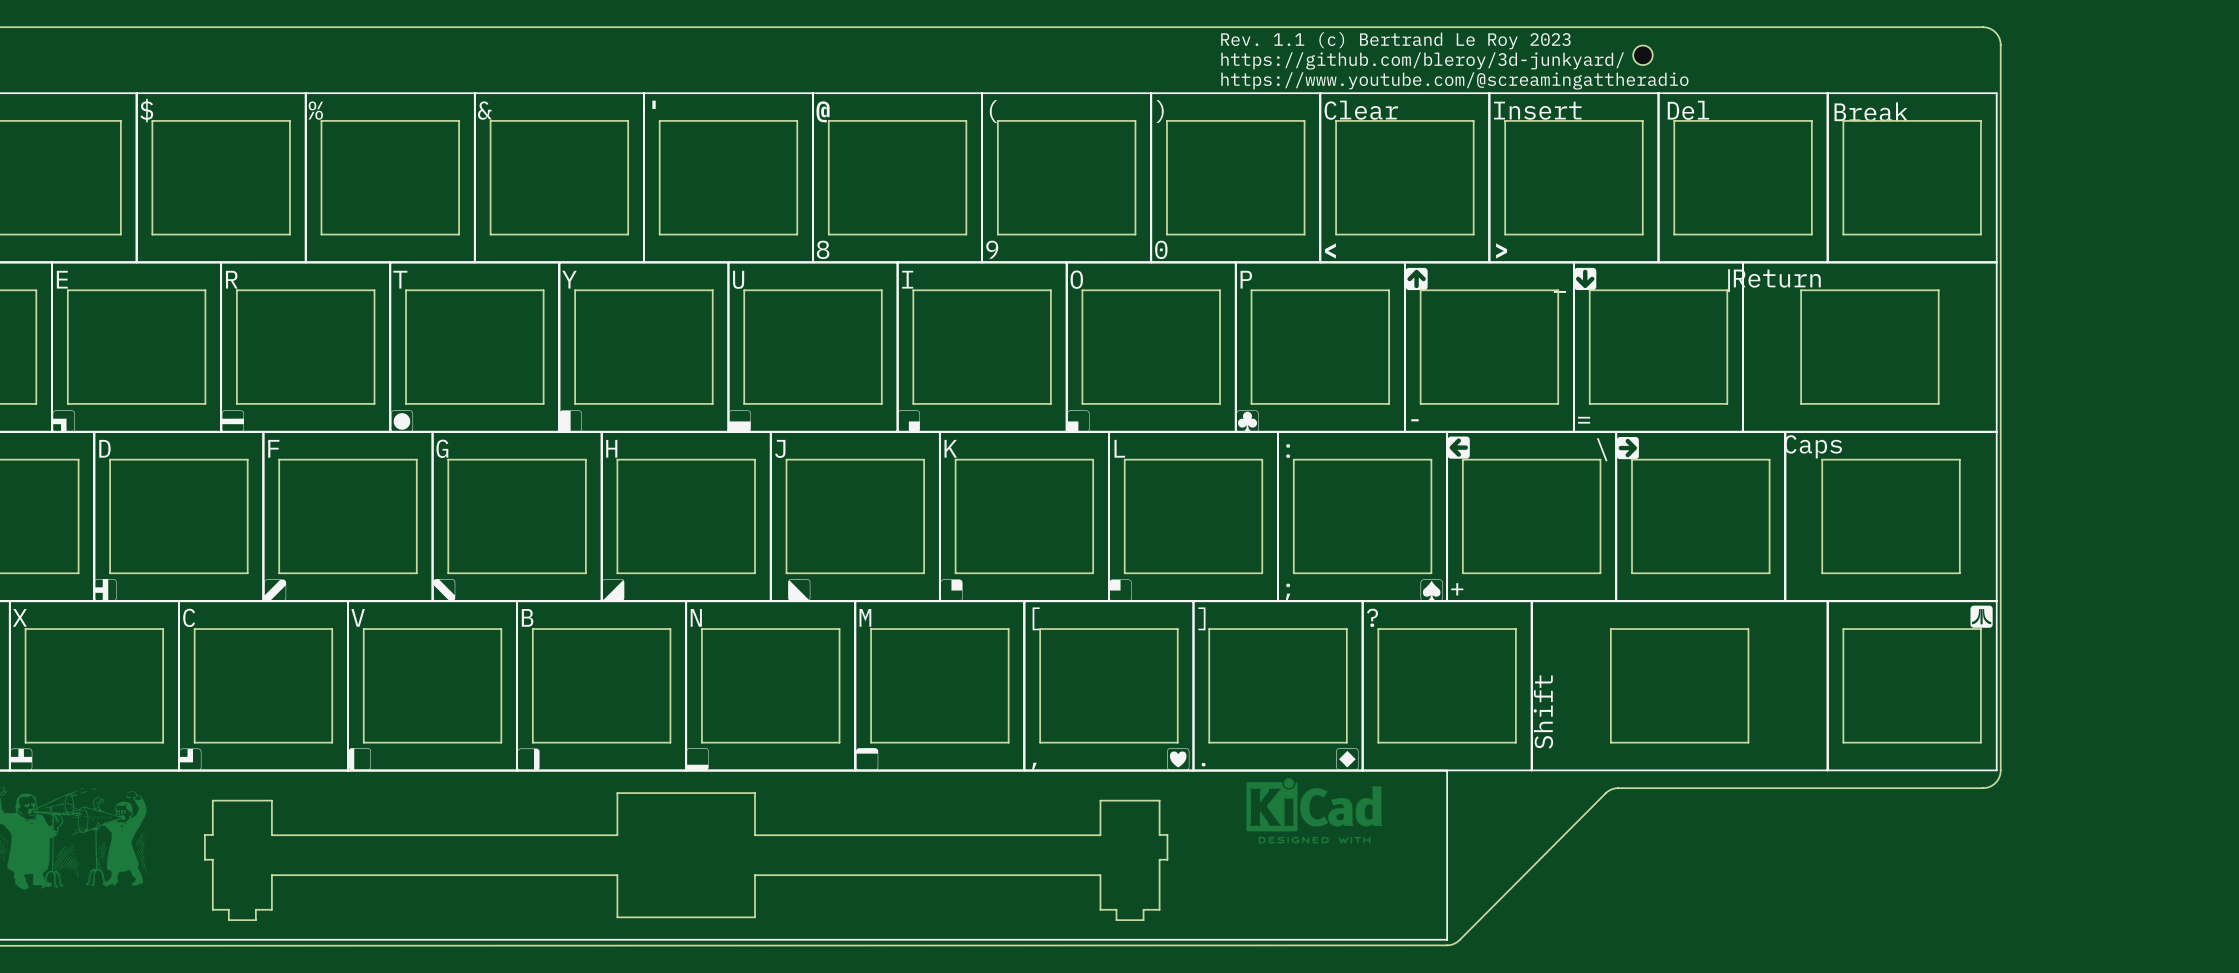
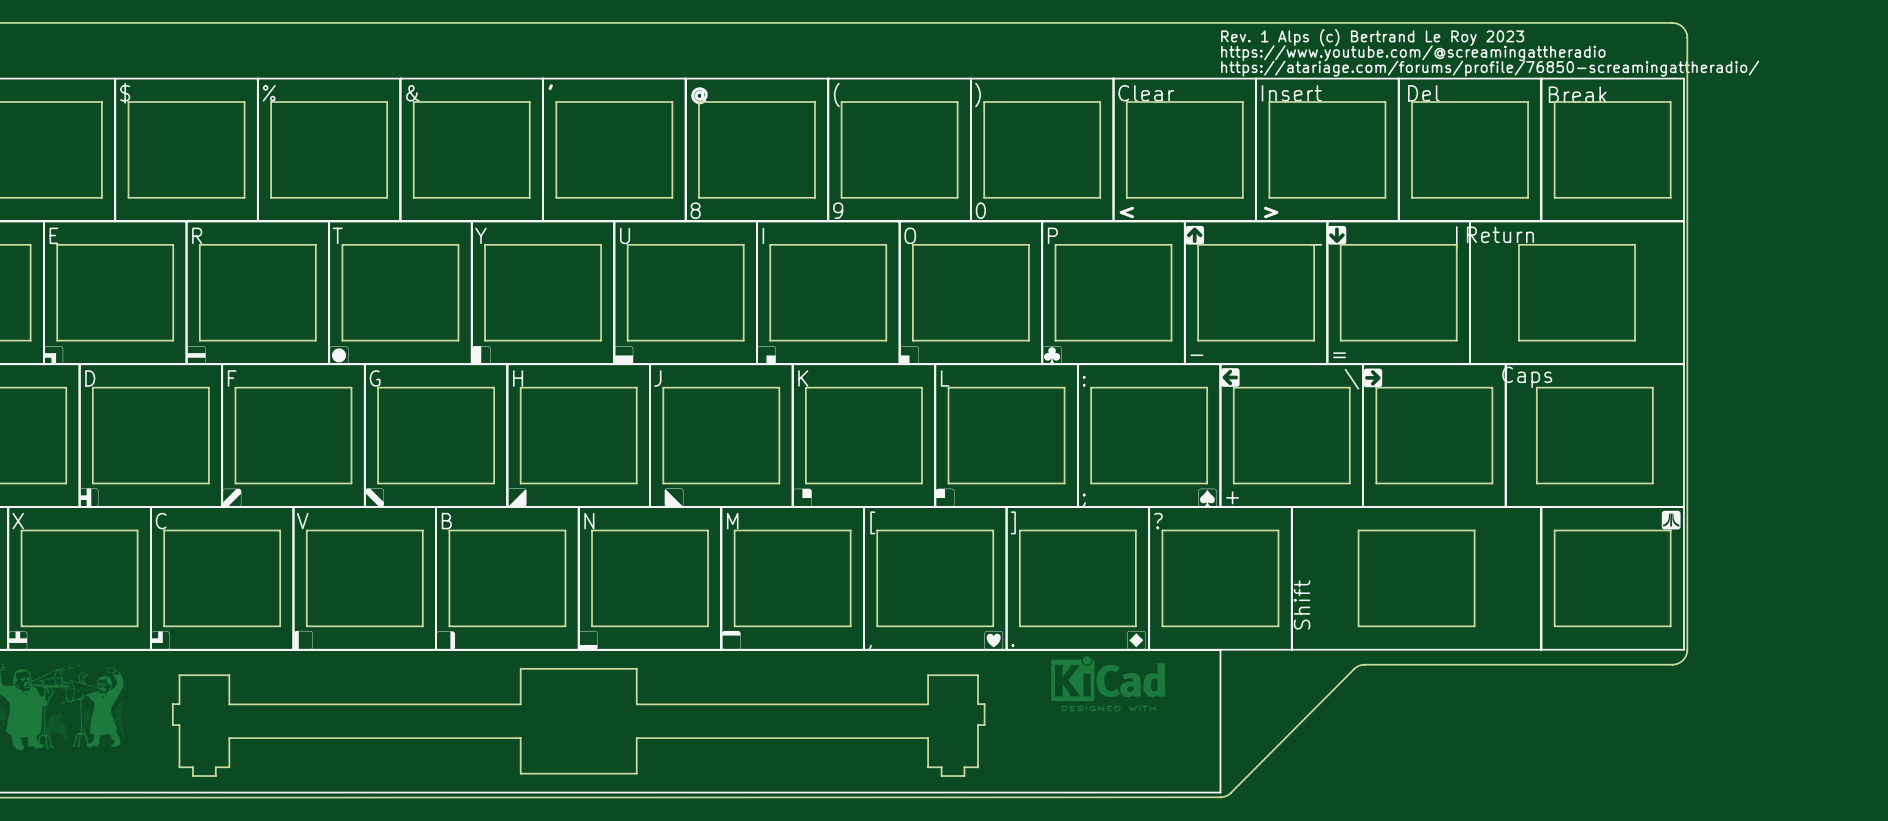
text: Rev. 1.1 (c) Bertrand Le Roy 2023 (1395, 40) -> none
text: none -> Rev. 1 Alps (c) Bertrand Le Roy 2023 (1372, 37)
part: (1642, 55) -> none
text: https://github.com/bleroy/3d-junkyard/ (1422, 60) -> none
text: none -> https://www.youtube.com/@screamingattheradio (1413, 53)
text: https://www.youtube.com/@screamingattheradio (1454, 80) -> none
text: none -> https://atariage.com/forums/profile/76850-screamingattheradio/ (1490, 68)

